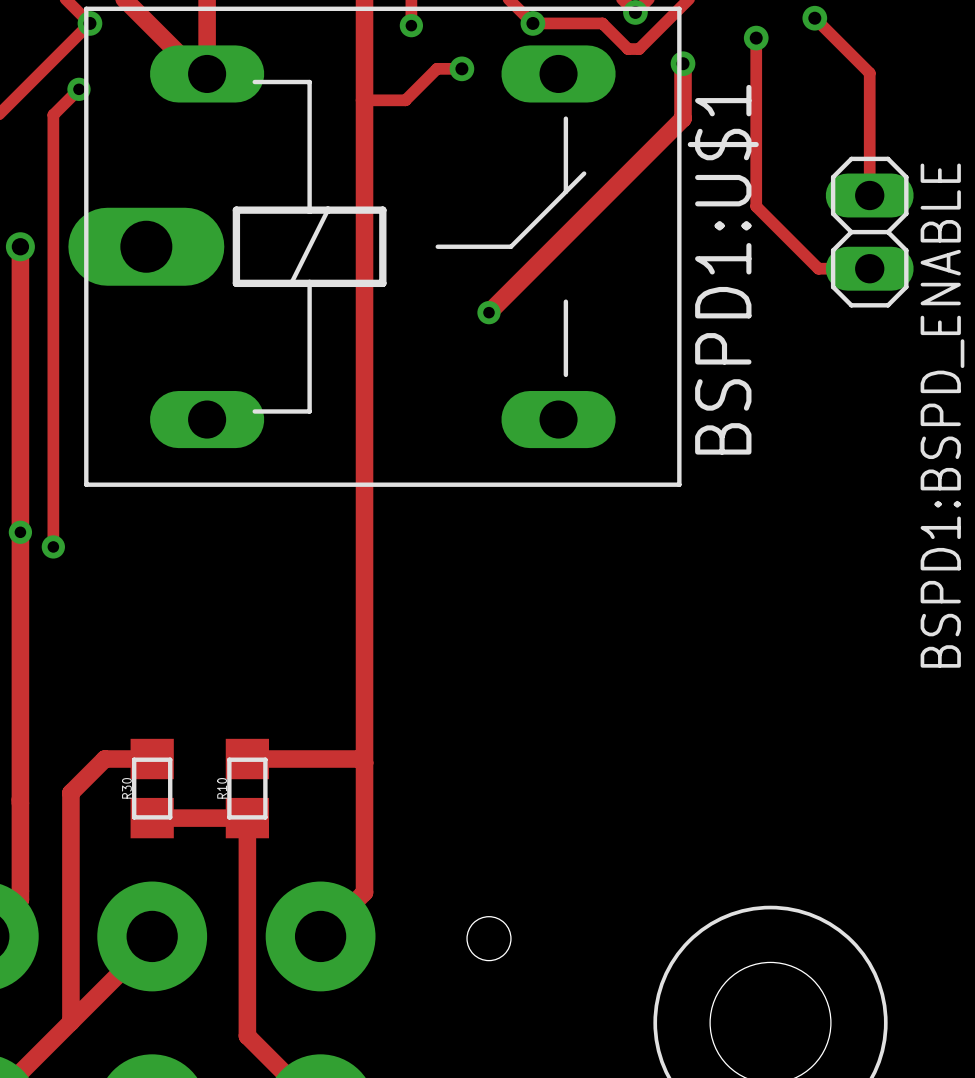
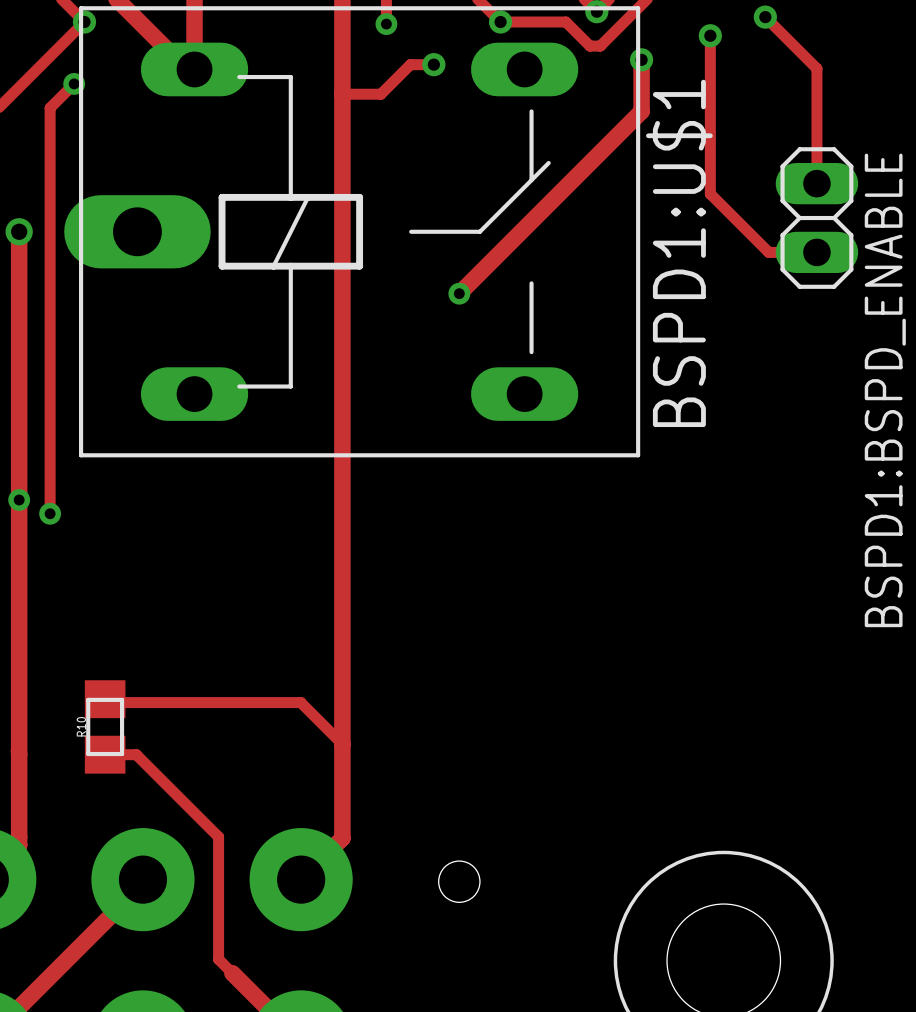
track: none -> (105, 699) (108, 702) (300, 702) (342, 744)
track: (152, 759) (104, 759) (70, 792) (70, 1022) -> none
track: (247, 759) (360, 759) (364, 762) -> none
R30: (152, 788) -> none
R10 position: (247, 788) -> (105, 726)
track: (152, 818) (247, 818) (247, 1036) -> (105, 754) (136, 754) (218, 836) (218, 959) (232, 973)

